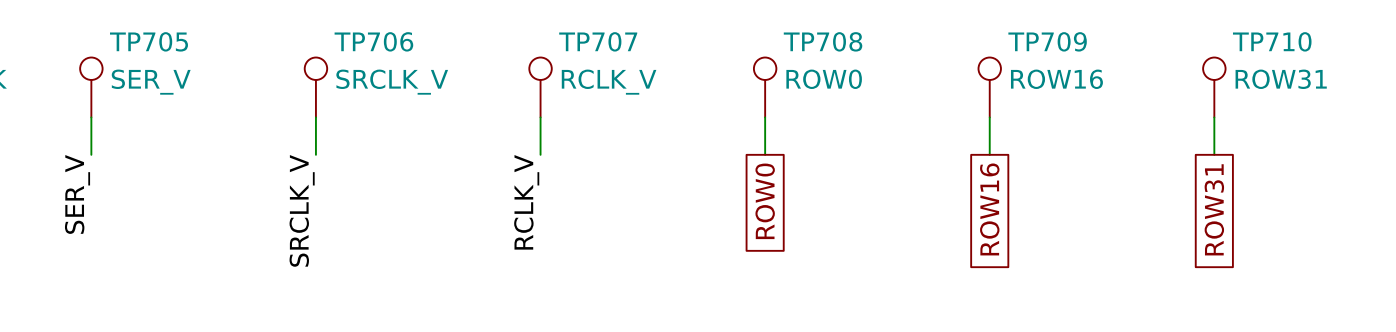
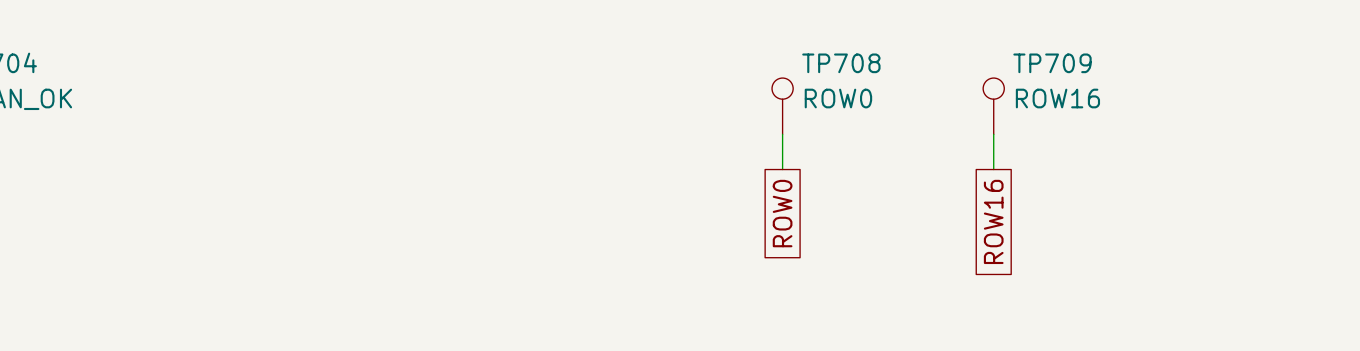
TP705: SER_V (91, 87) -> none
TP706: SRCLK_V (315, 87) -> none
TP707: RCLK_V (540, 87) -> none
TP710: ROW31 (1214, 87) -> none
wire: (91, 117) (91, 154) -> none
wire: (315, 117) (315, 154) -> none
wire: (540, 117) (540, 154) -> none
wire: (1214, 117) (1214, 154) -> none
label: SER_V (77, 194) -> none
label: RCLK_V (526, 202) -> none
global label: ROW31 (1214, 209) -> none
label: SRCLK_V (302, 210) -> none

